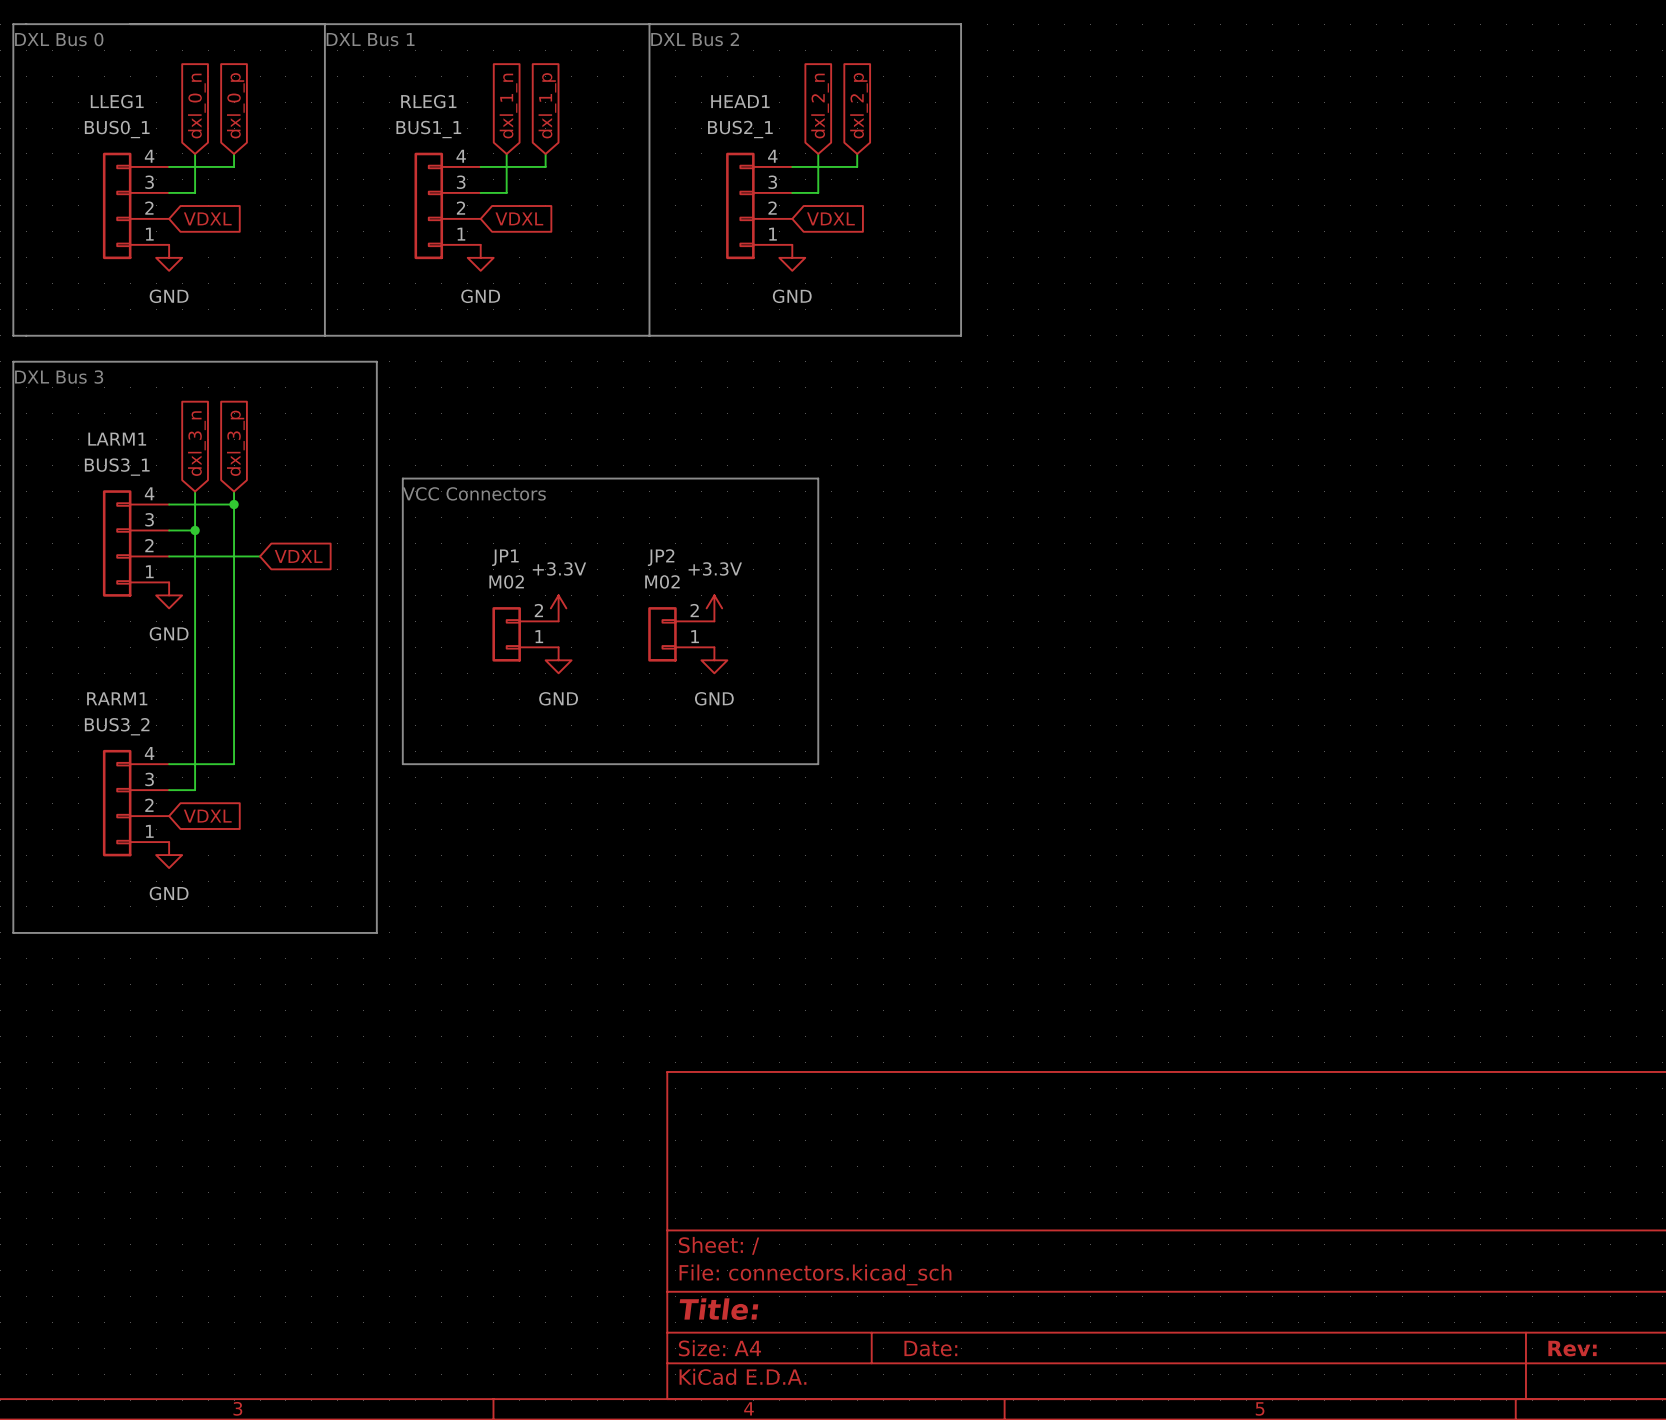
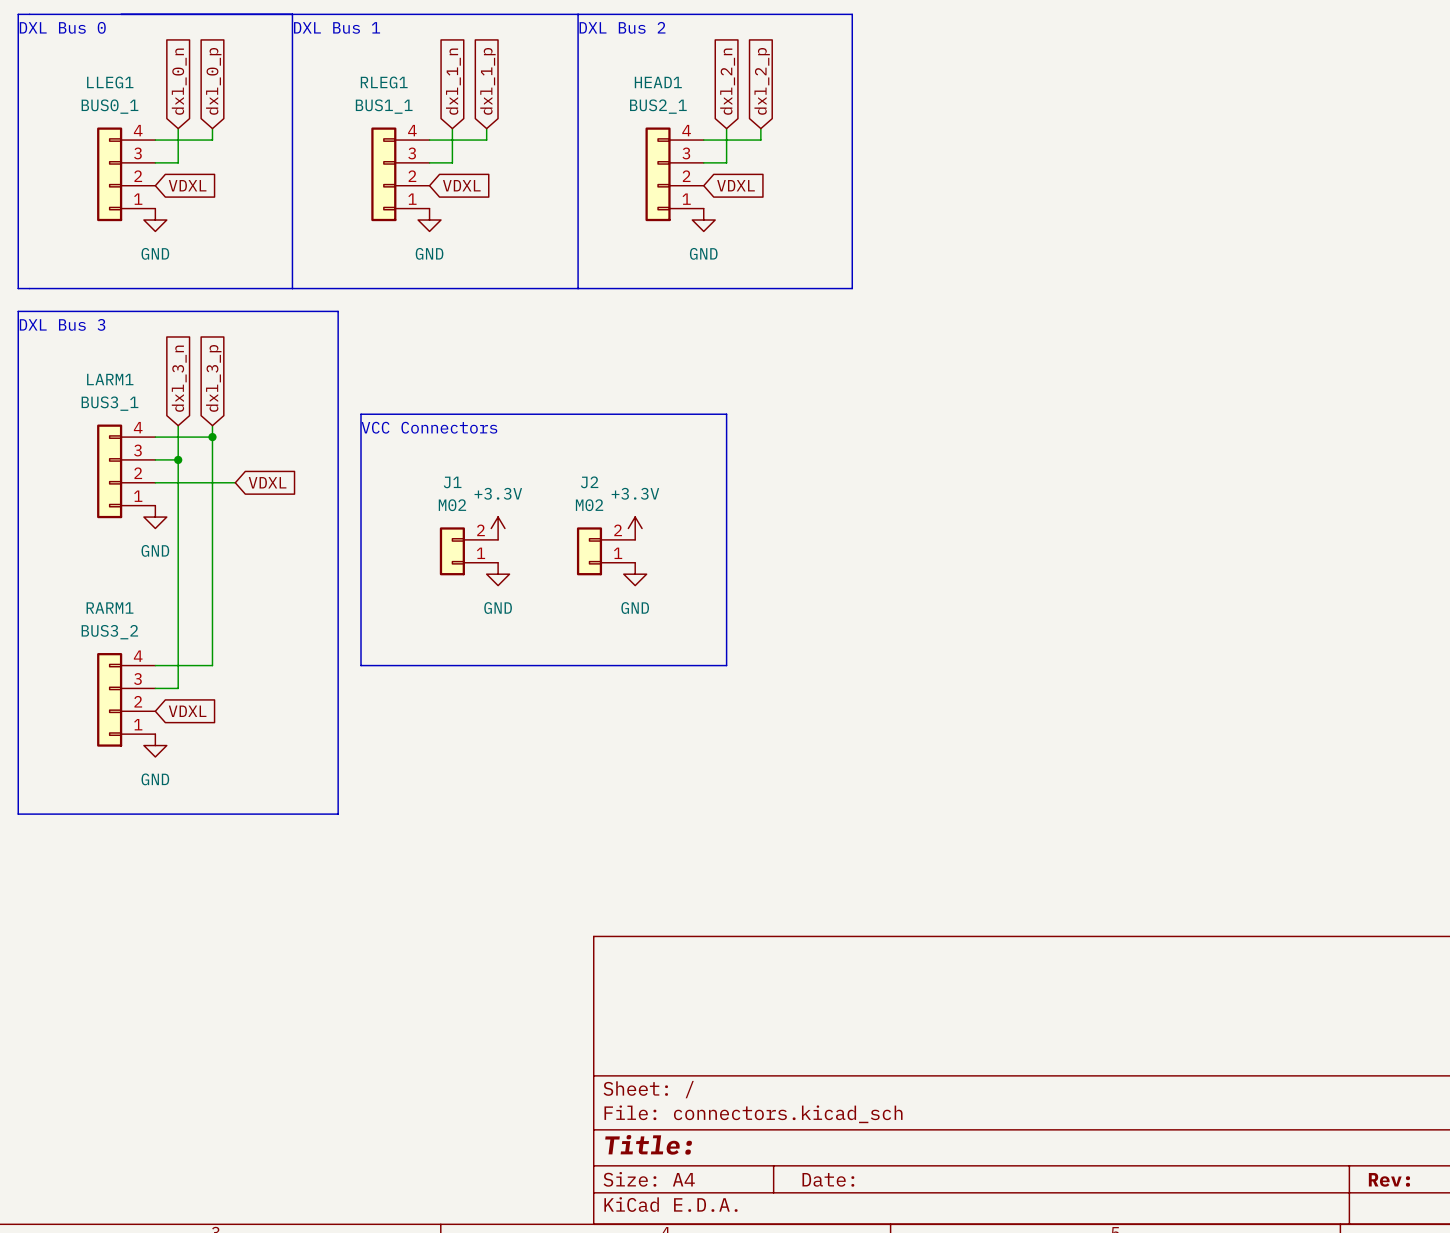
JP1 name: JP1 (505, 557) -> J1 (452, 482)
JP2 name: JP2 (661, 557) -> J2 (589, 482)

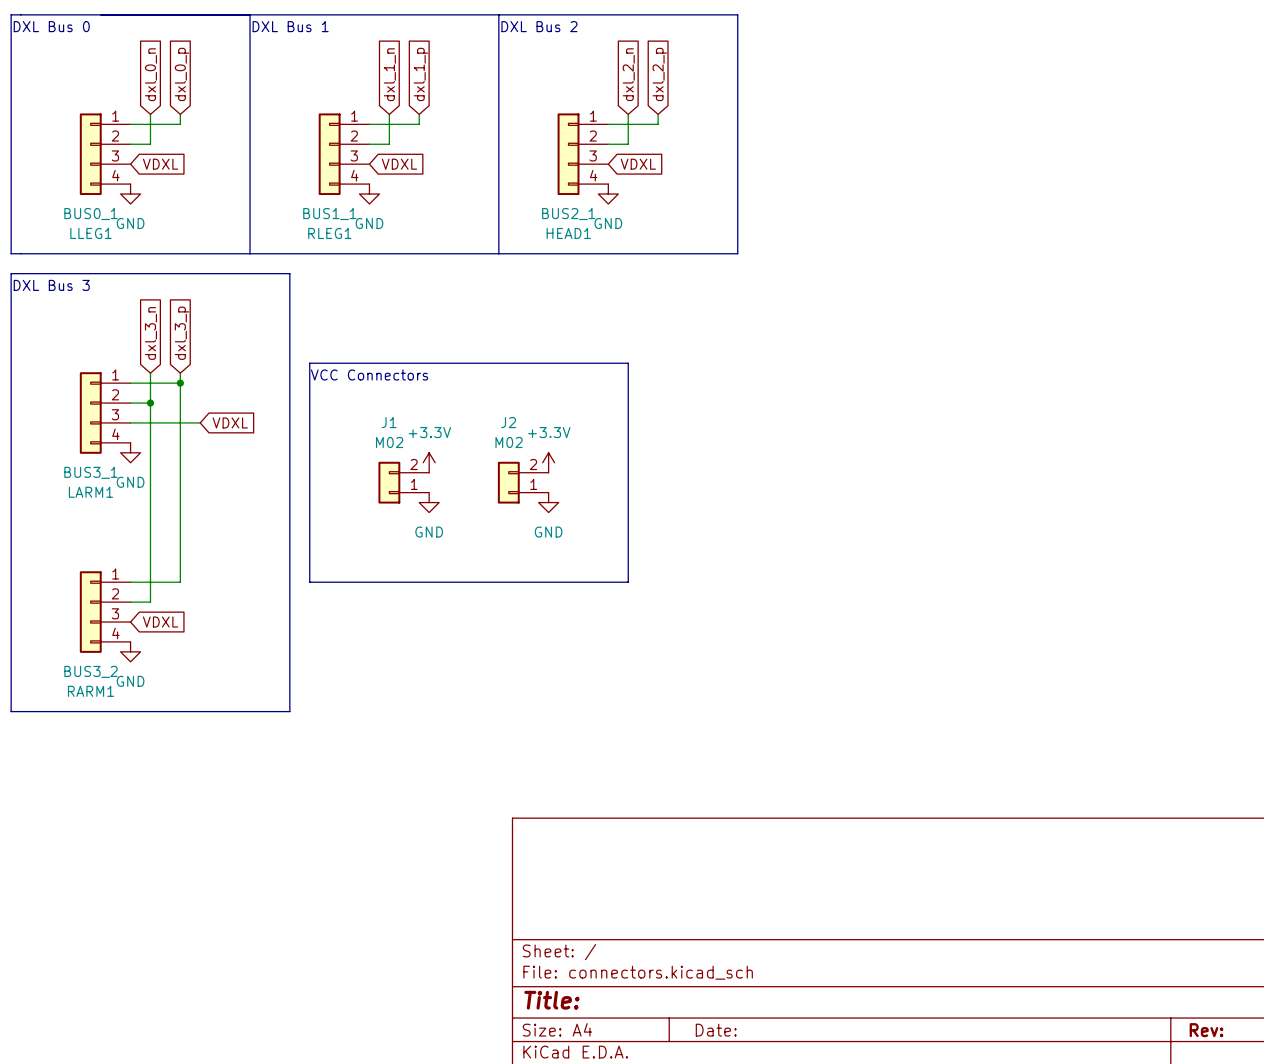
LLEG1 flip: as is (109, 174) -> up-down (90, 154)
RLEG1 flip: as is (383, 174) -> up-down (329, 154)
HEAD1 flip: as is (658, 174) -> up-down (568, 154)
LARM1 flip: as is (109, 471) -> up-down (90, 413)
RARM1 flip: as is (109, 699) -> up-down (90, 612)

